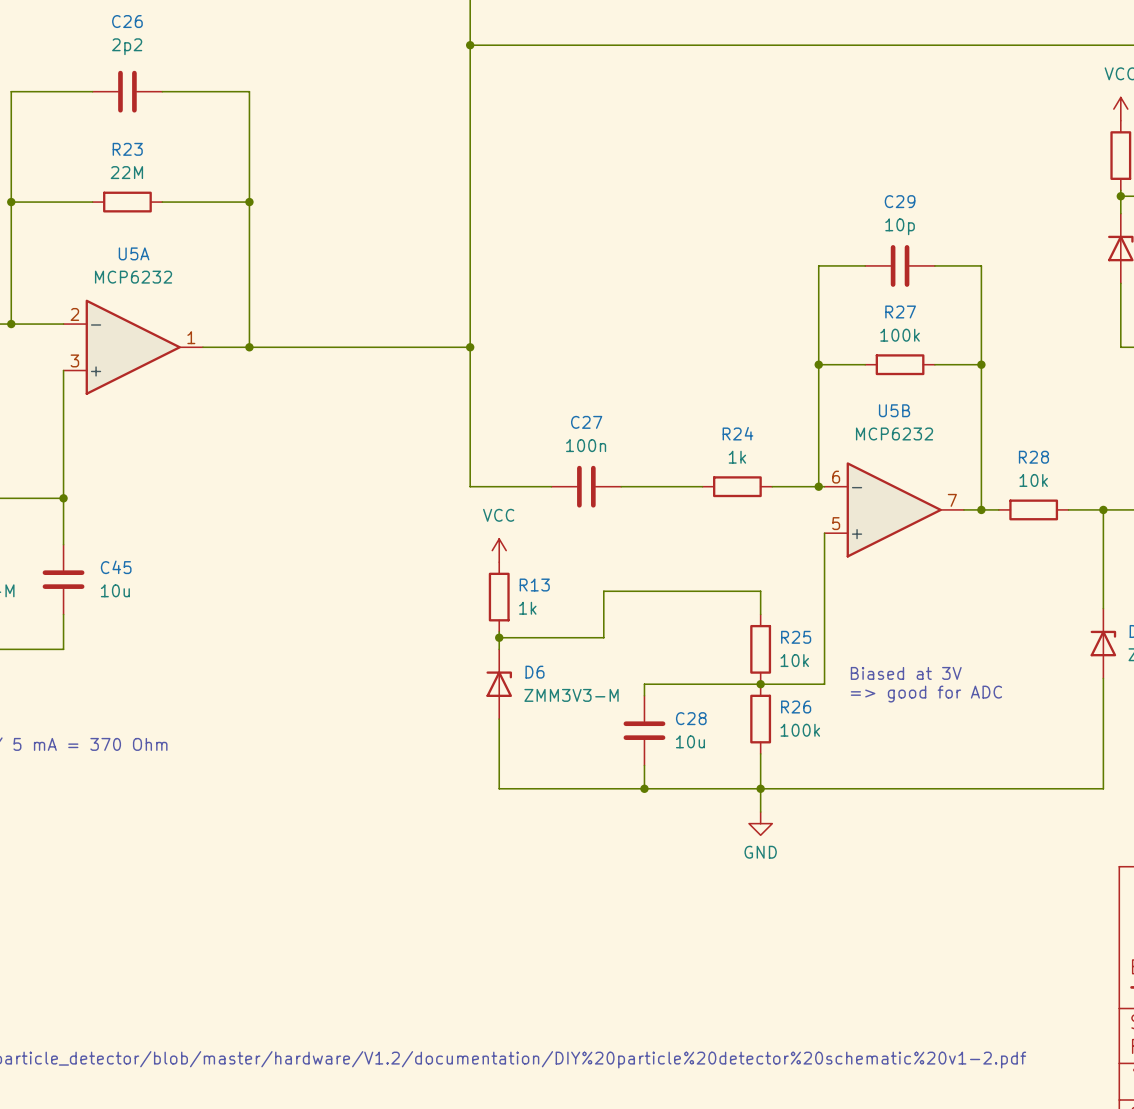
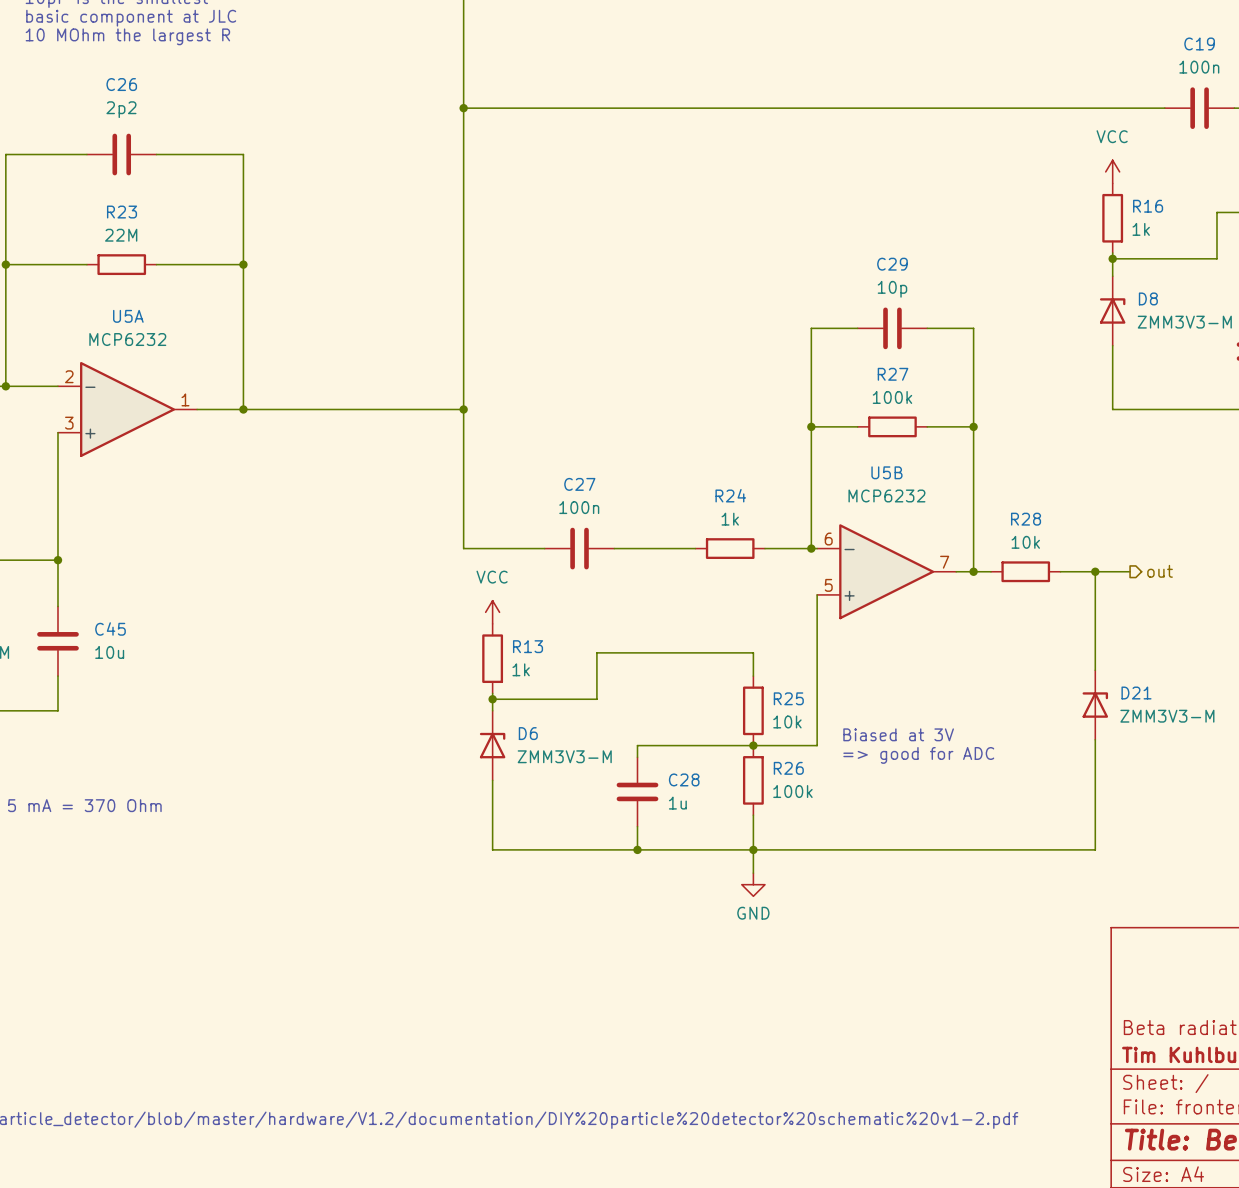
C28 value: 10u (690, 741) -> 1u (677, 803)

